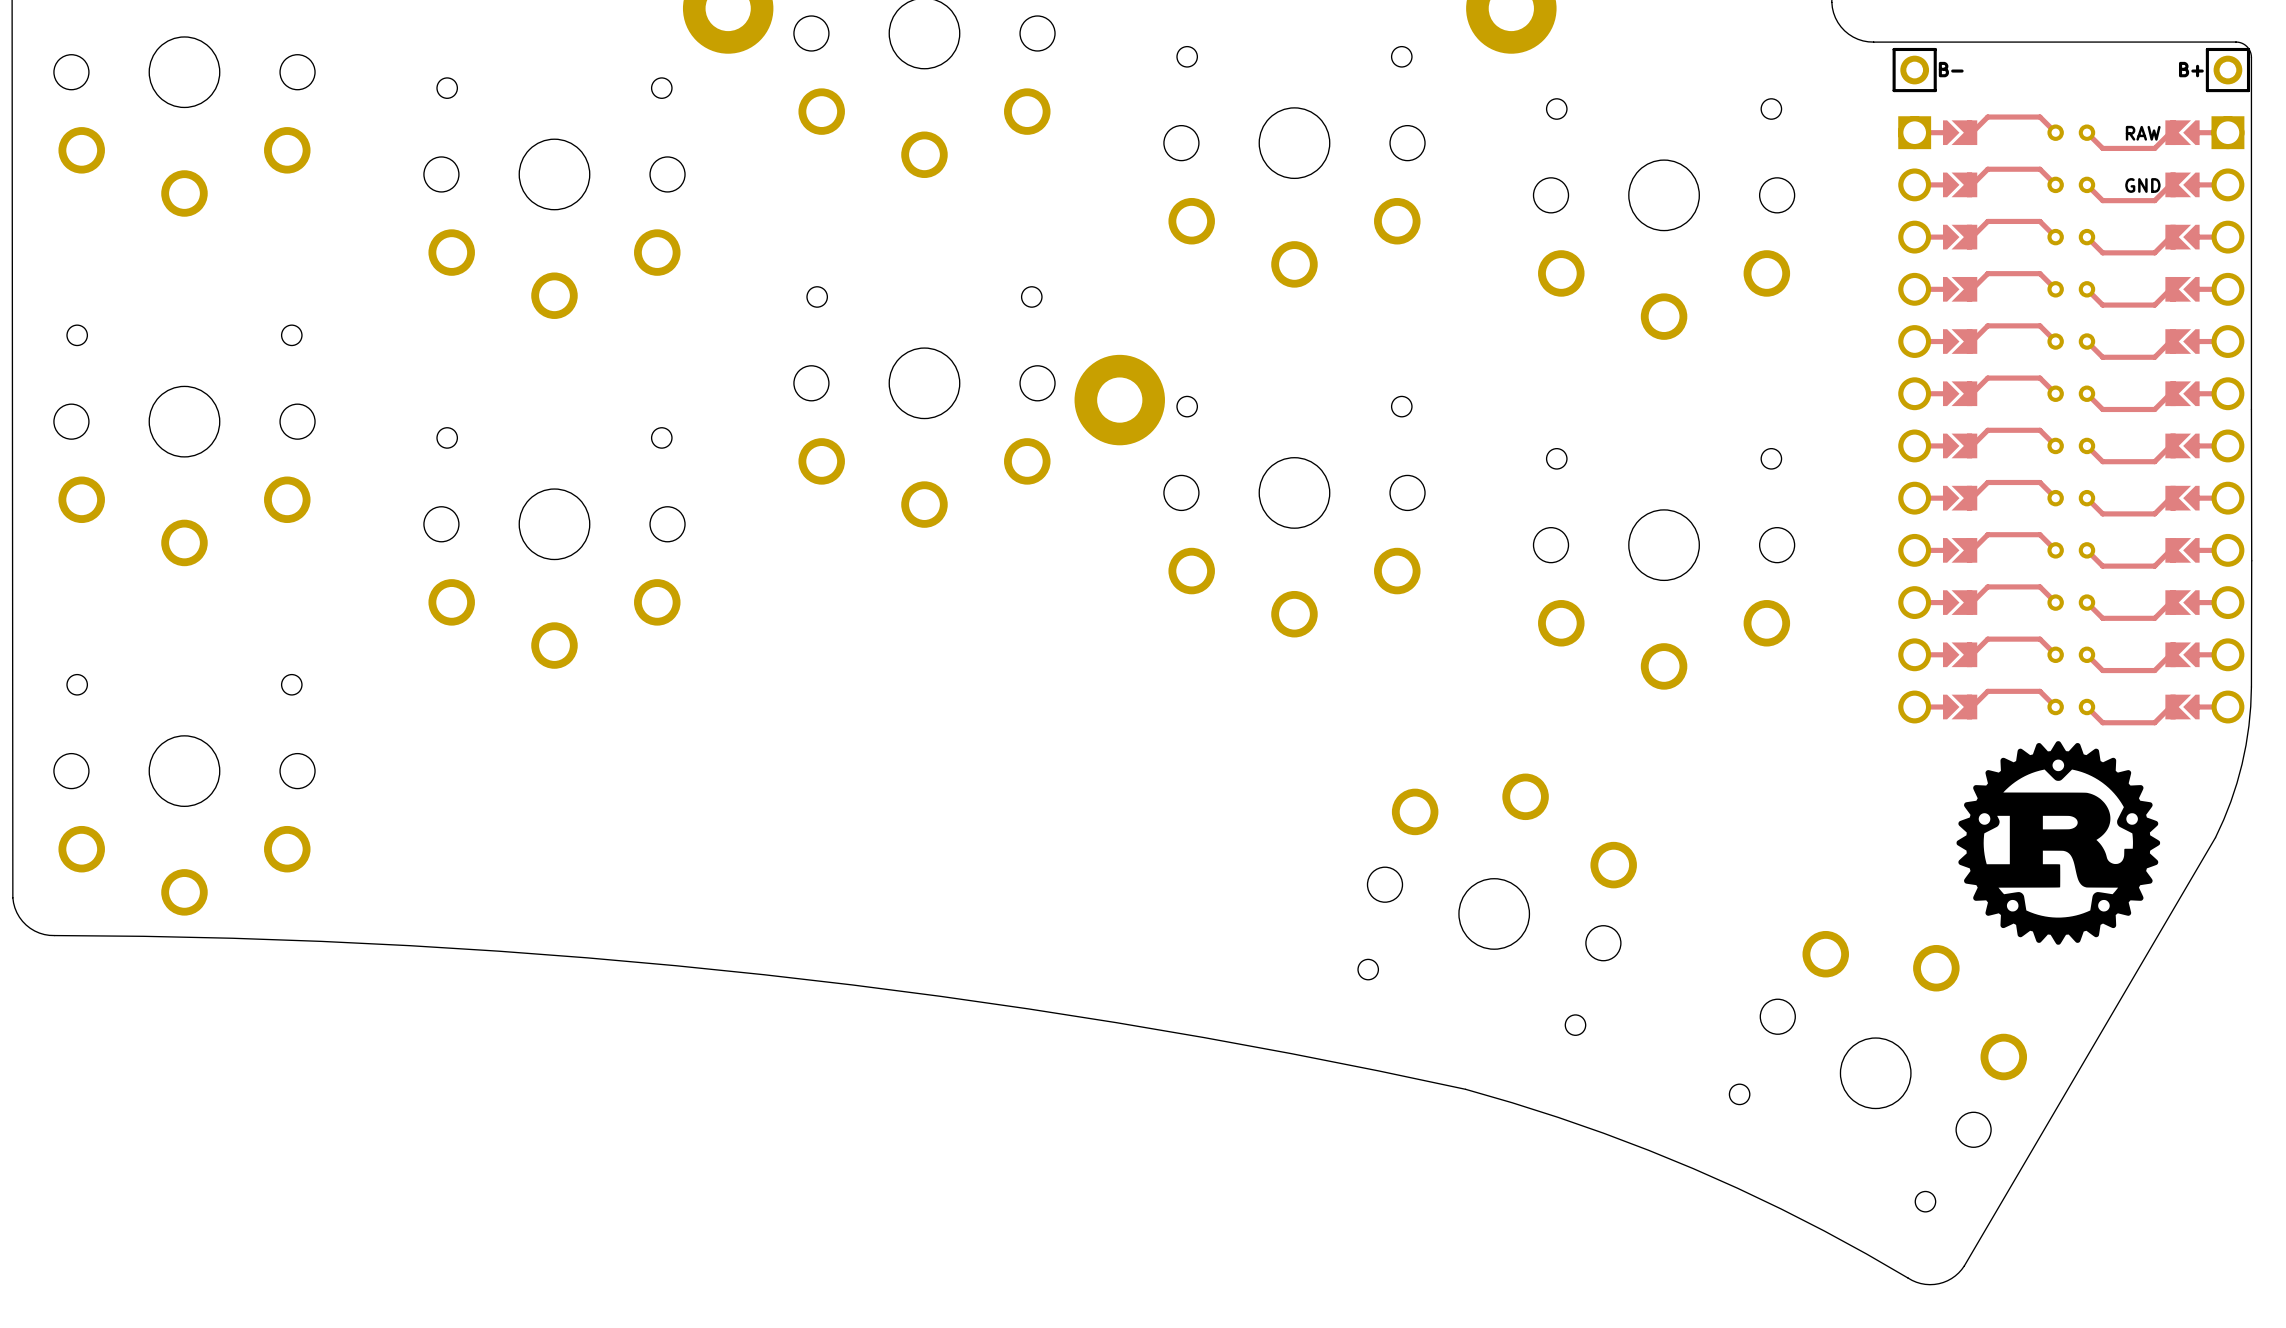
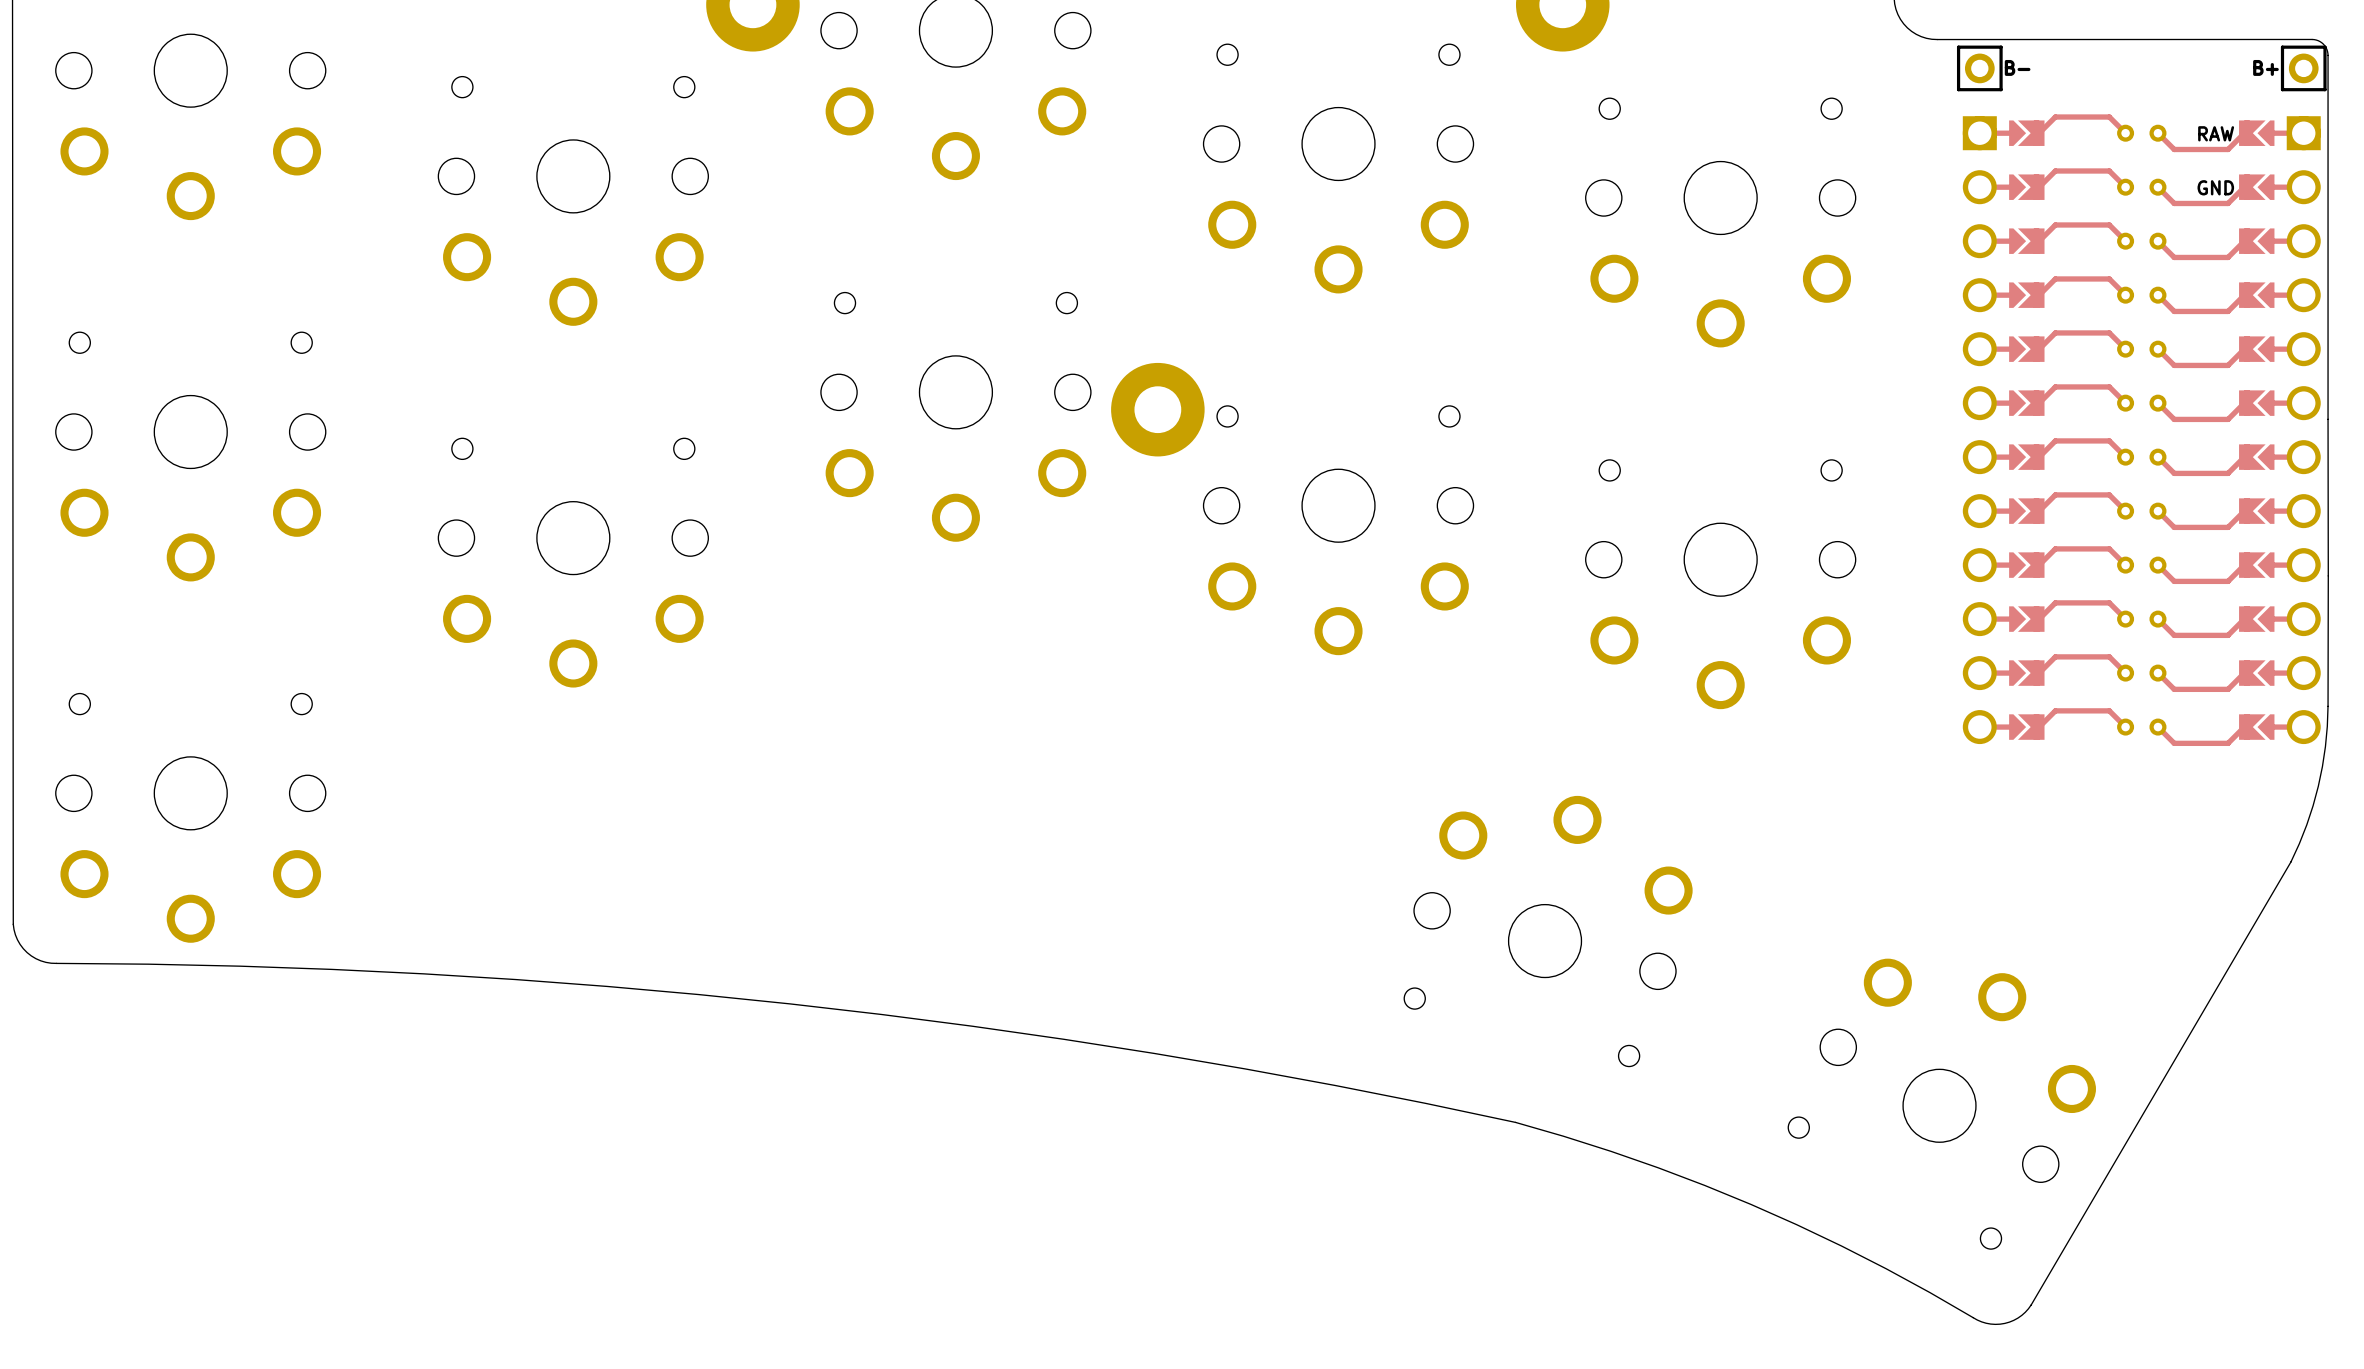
drawing: [1956, 741, 2161, 945] -> none

